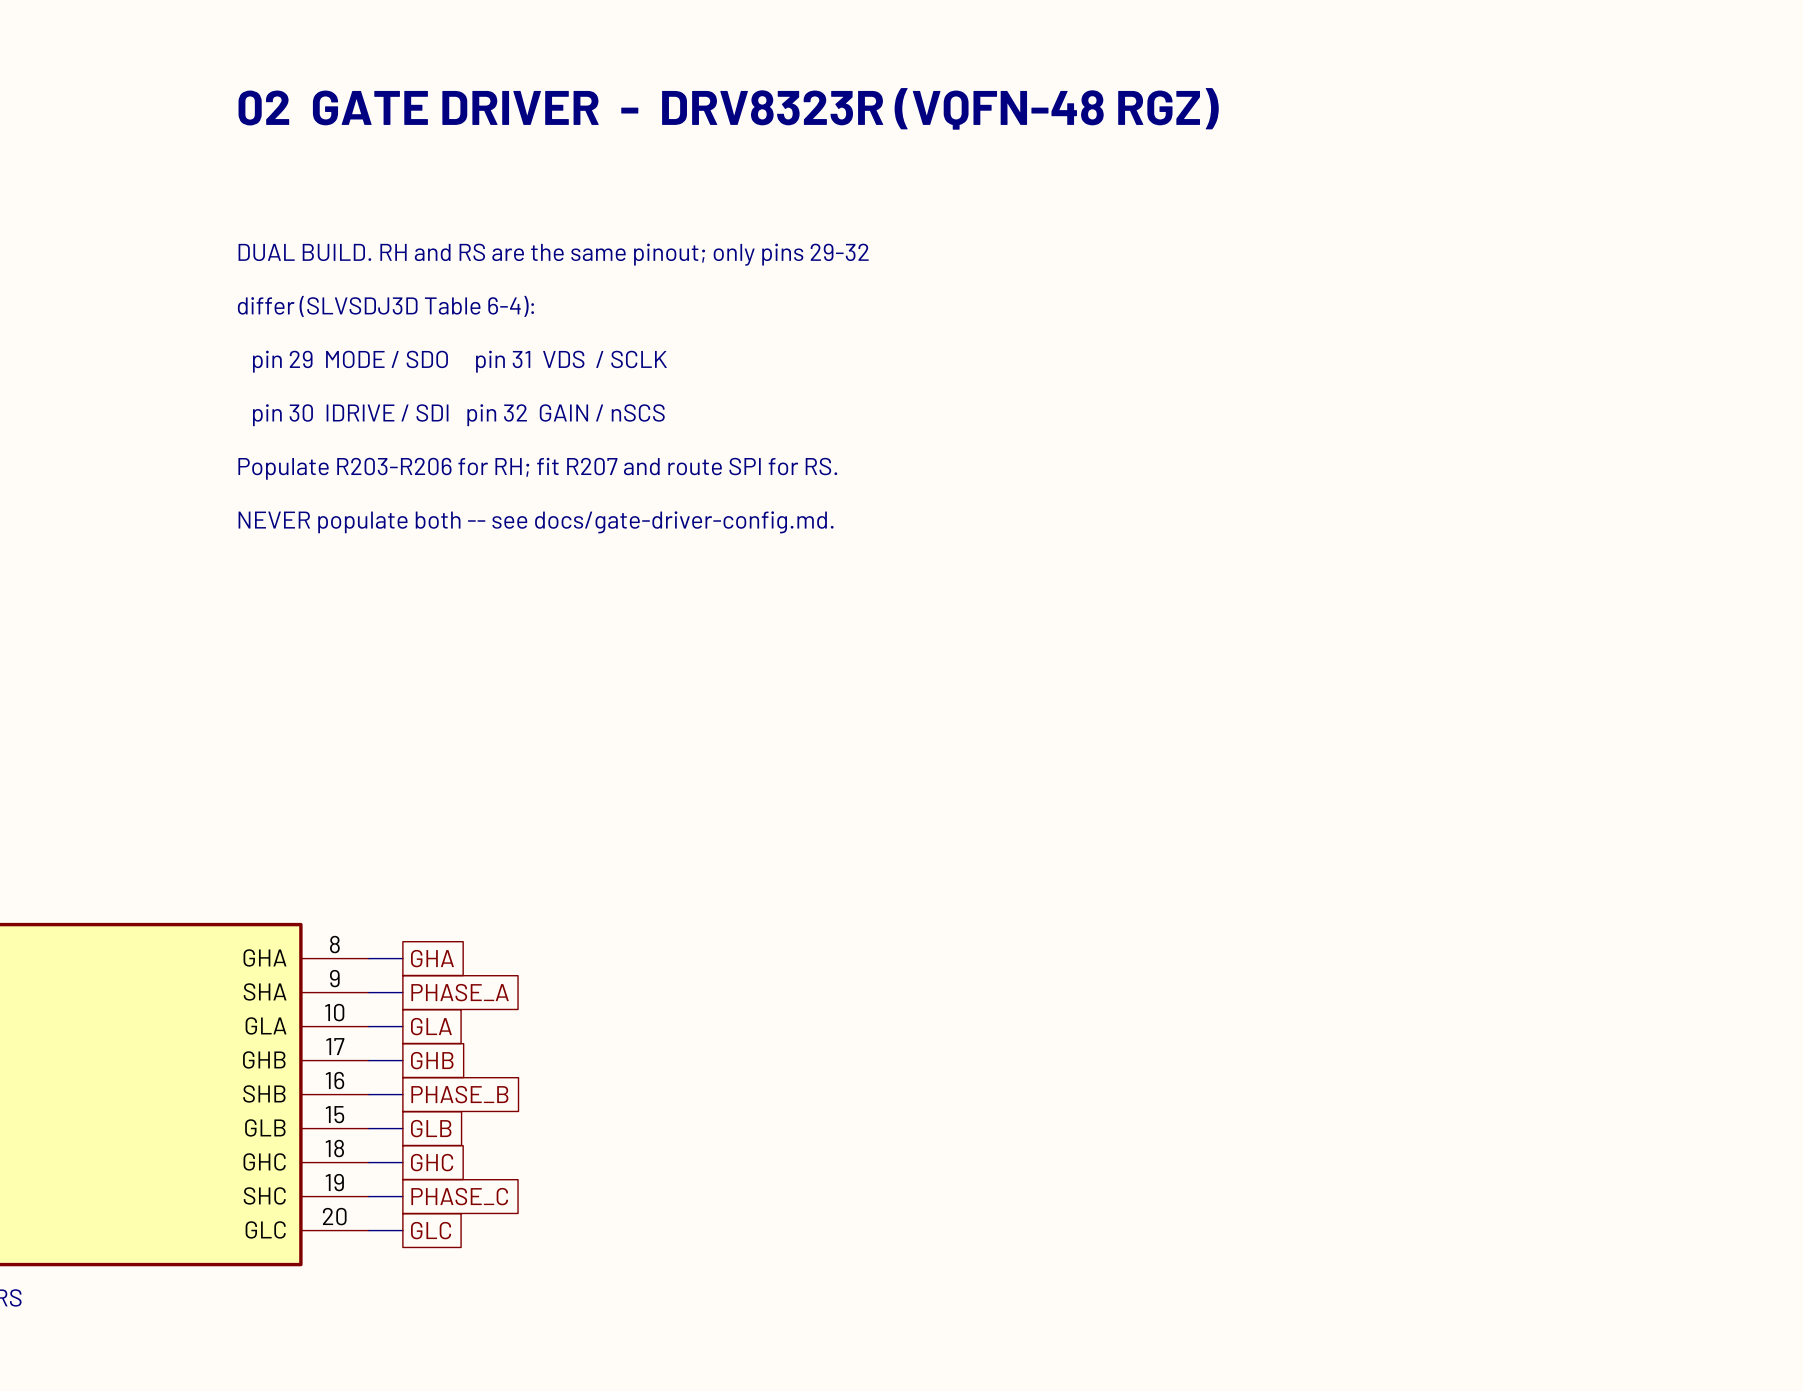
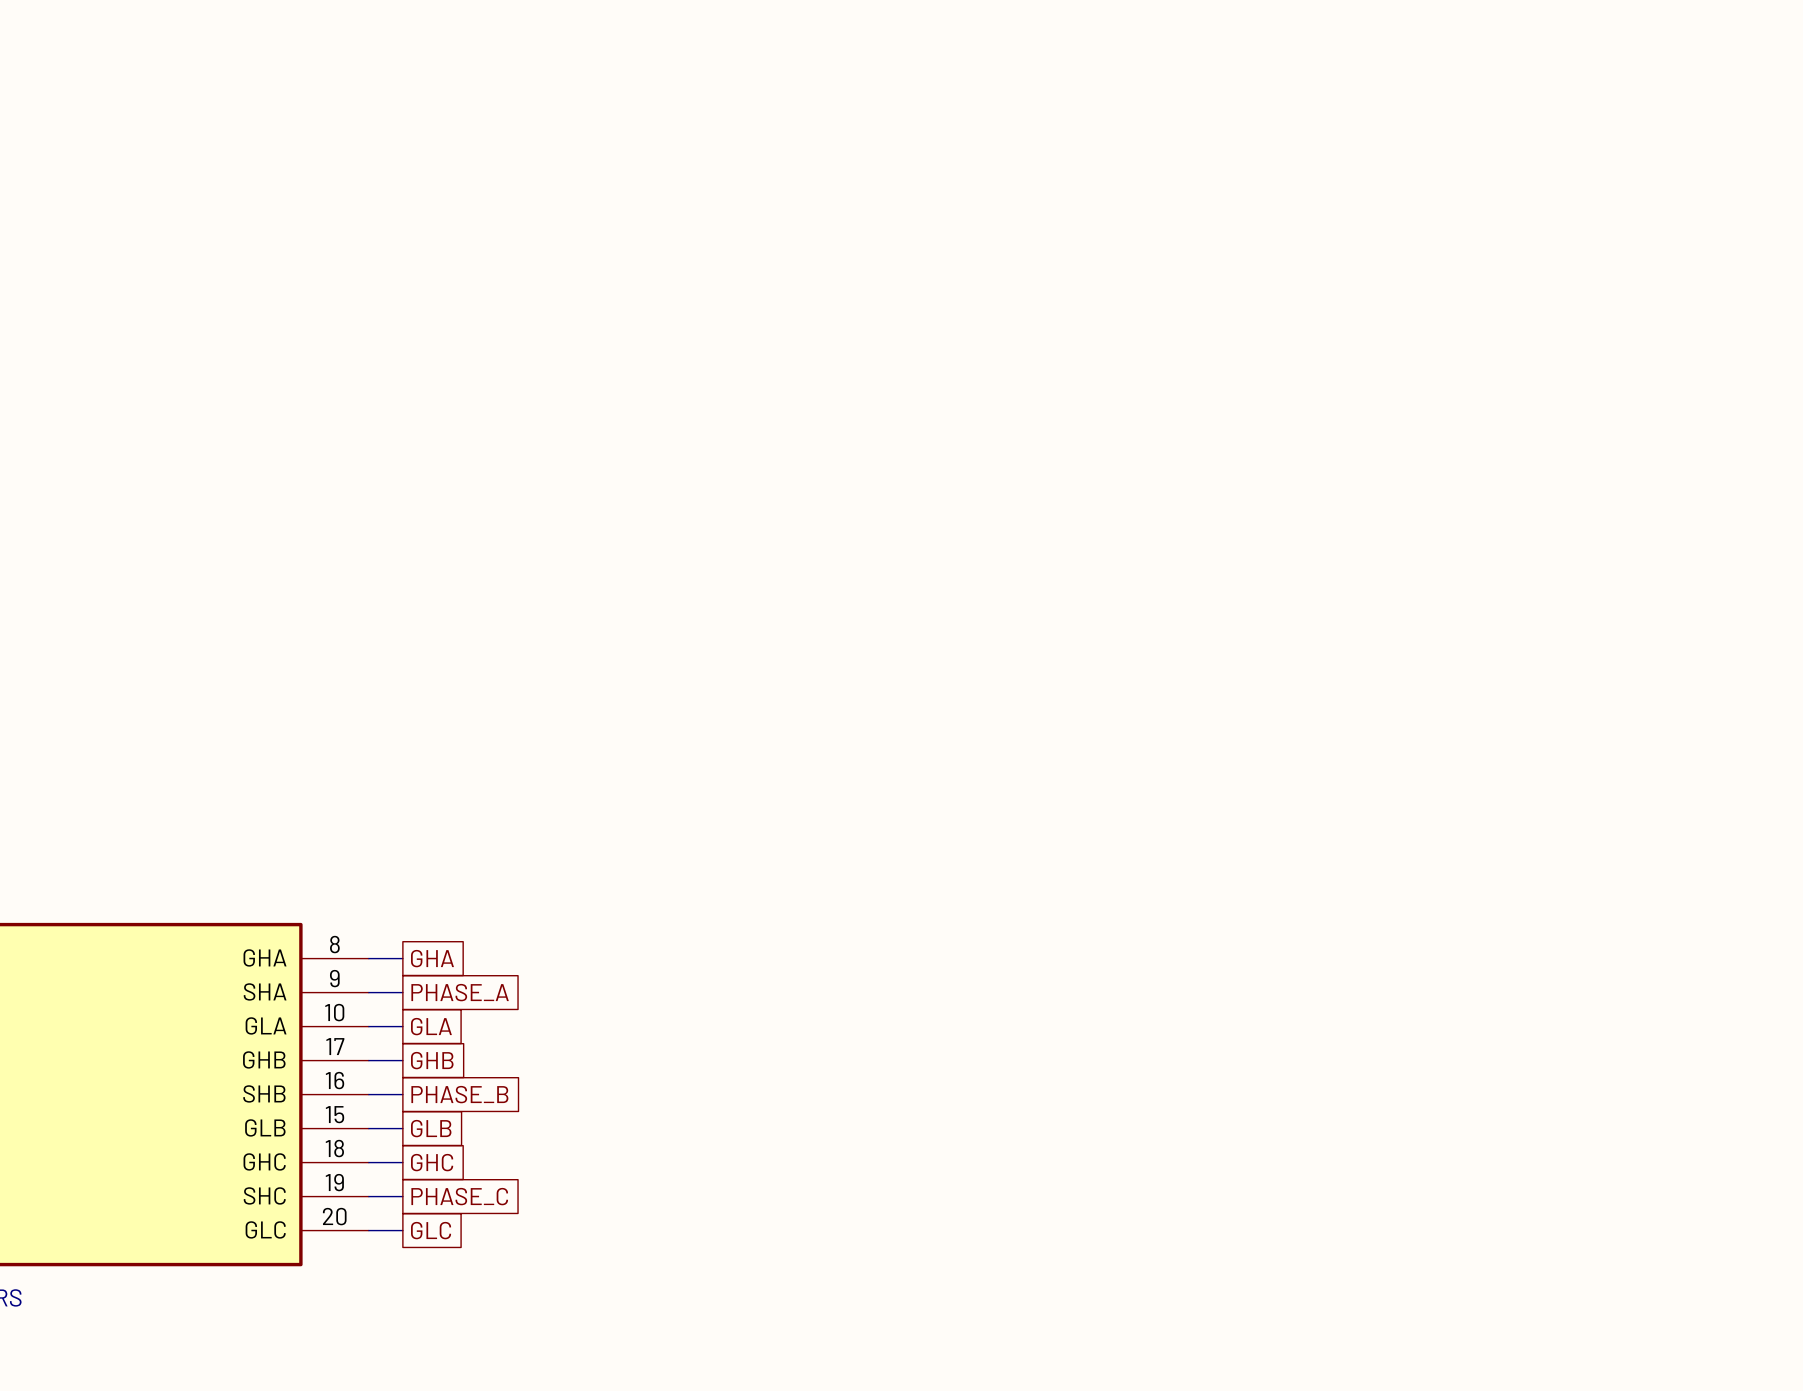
text: 02 GATE DRIVER - DRV8323R (VQFN-48 RGZ) (728, 108) -> none
text: DUAL BUILD. RH and RS are the same pinout; only pins 29-32 (553, 254) -> none
text: differ (SLVSDJ3D Table 6-4): (385, 306) -> none
text: pin 29 MODE / SDO pin 31 VDS / SCLK (459, 361) -> none
text: pin 30 IDRIVE / SDI pin 32 GAIN / nSCS (458, 415) -> none
text: Populate R203-R206 for RH; fit R207 and route SPI for RS. (537, 468) -> none
text: NEVER populate both -- see docs/gate-driver-config.md. (536, 522) -> none

